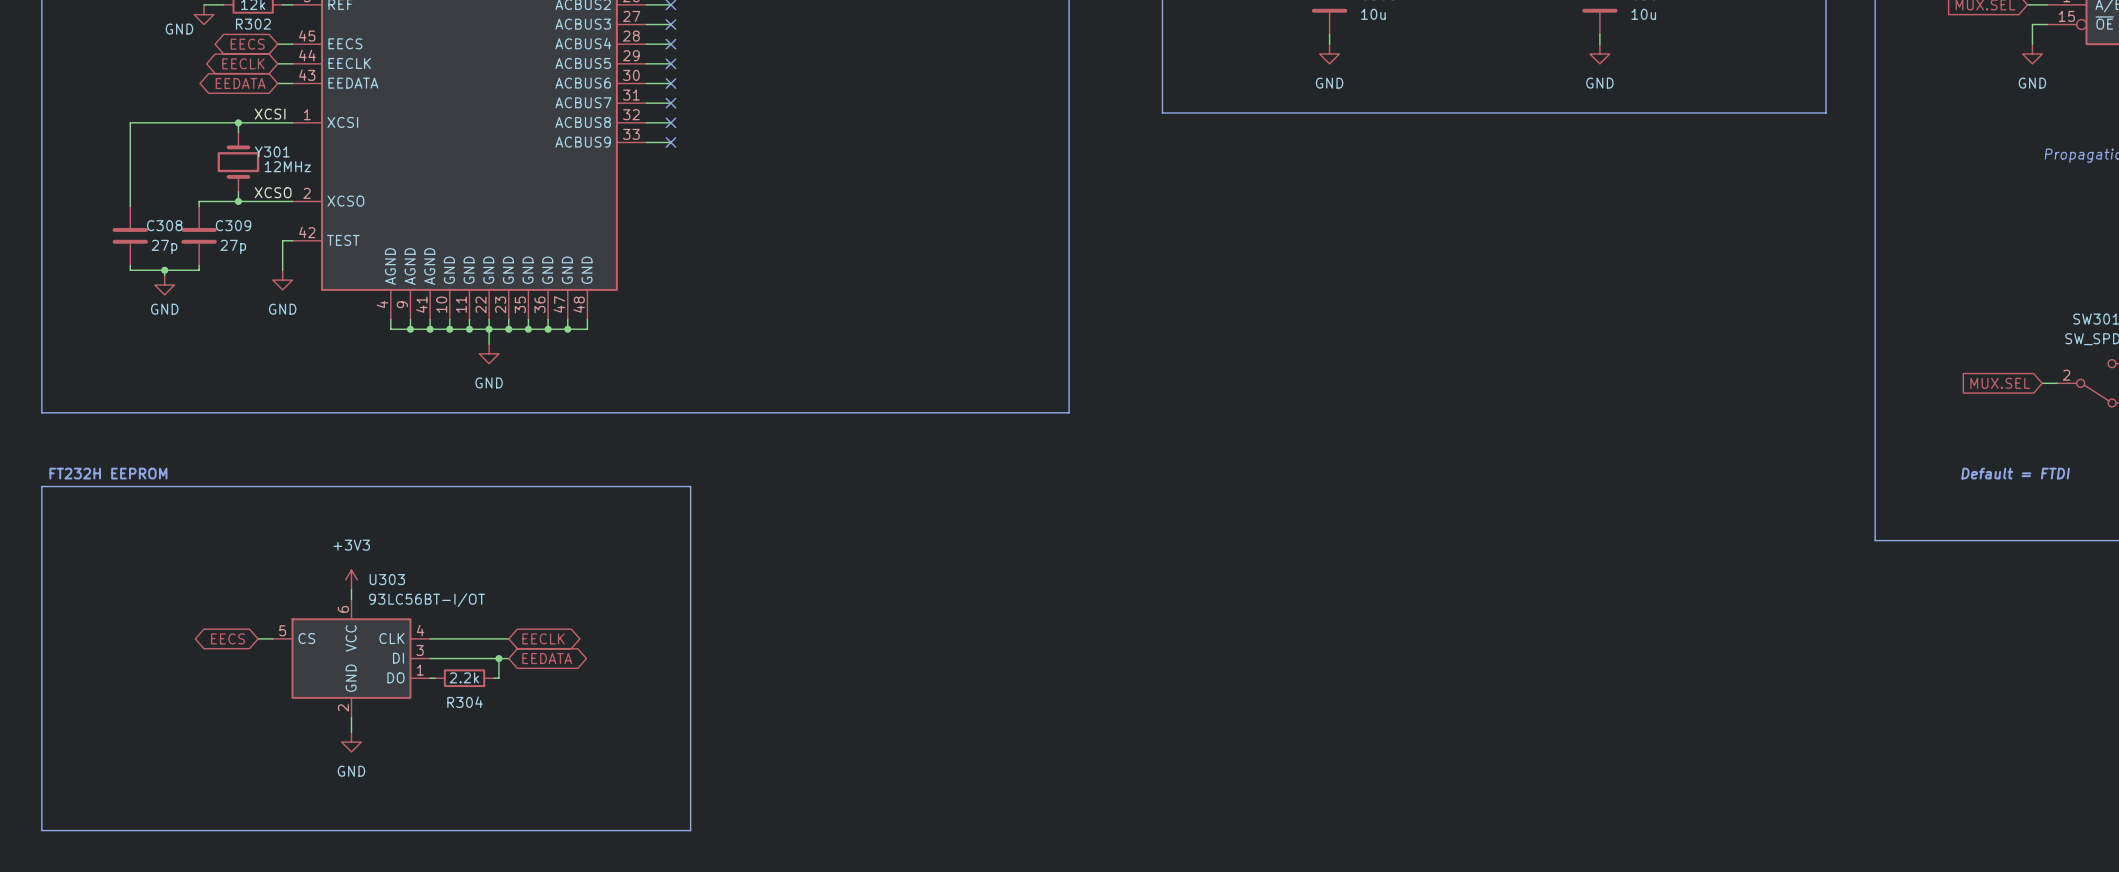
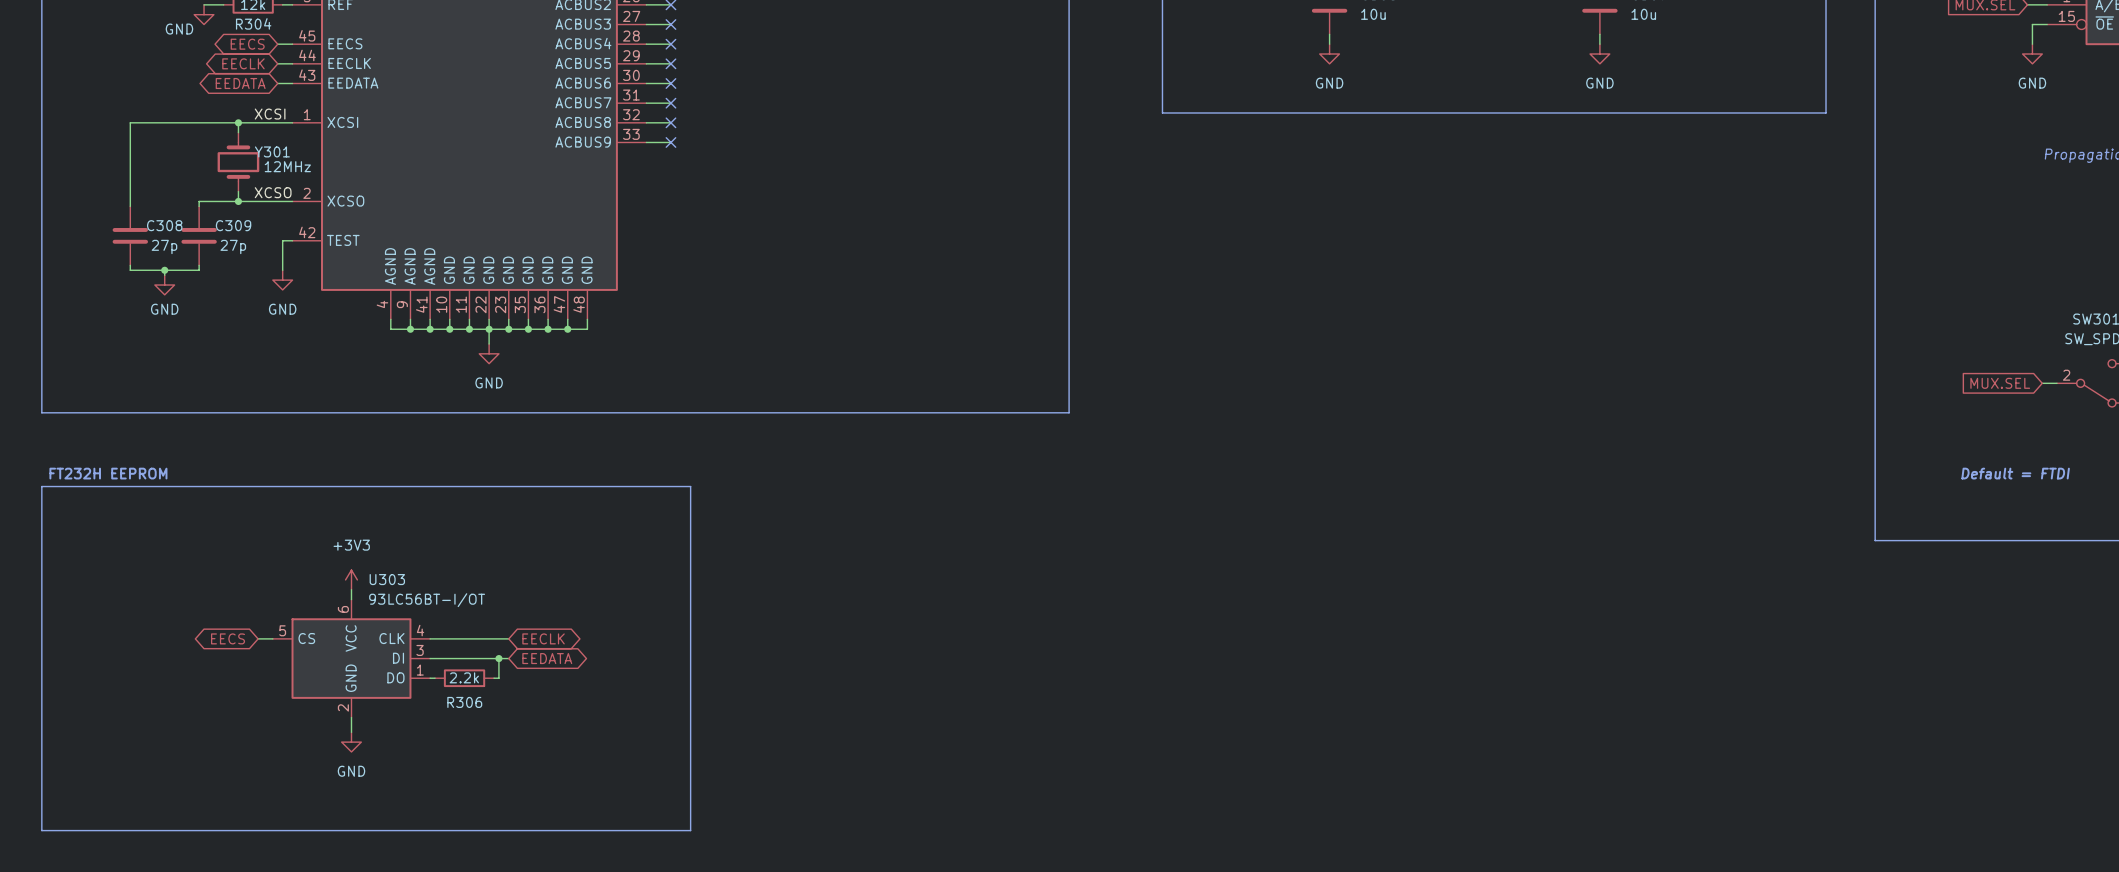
R302 name: R302 (253, 24) -> R304 (253, 23)
R304 name: R304 (465, 702) -> R306 (464, 702)

